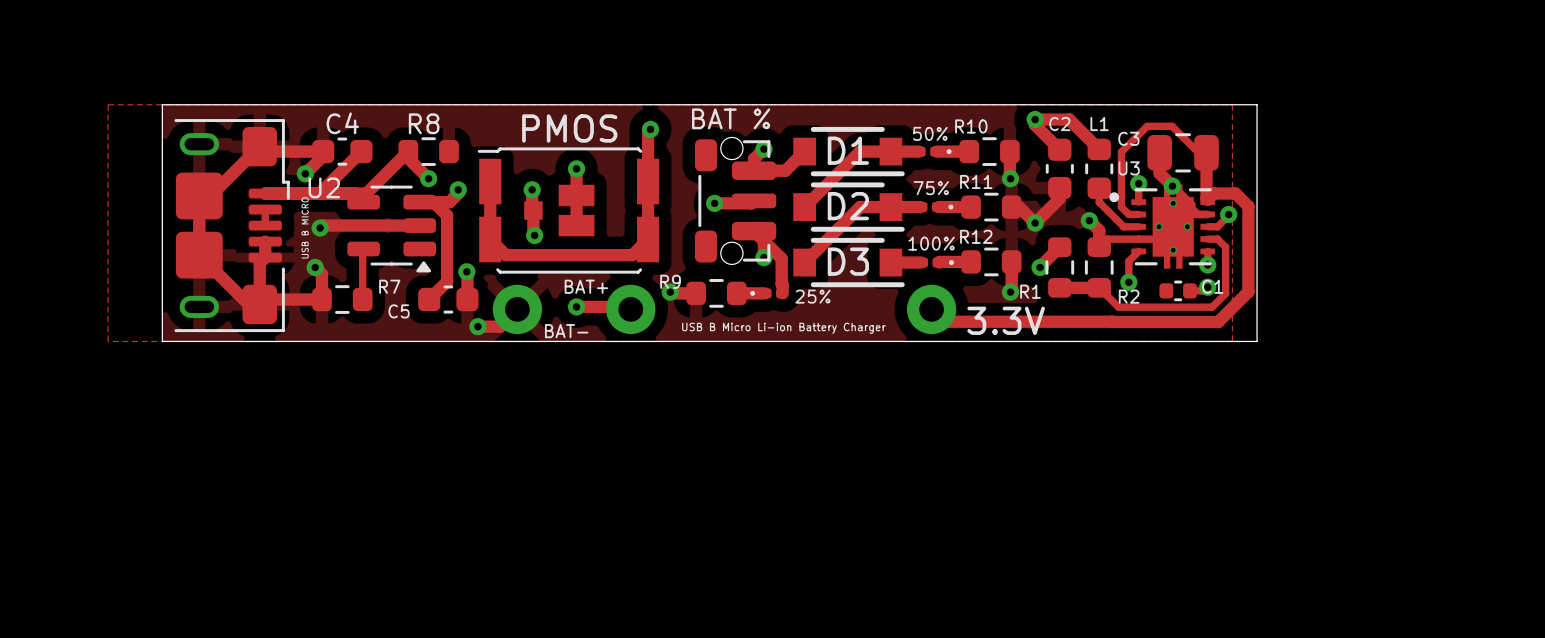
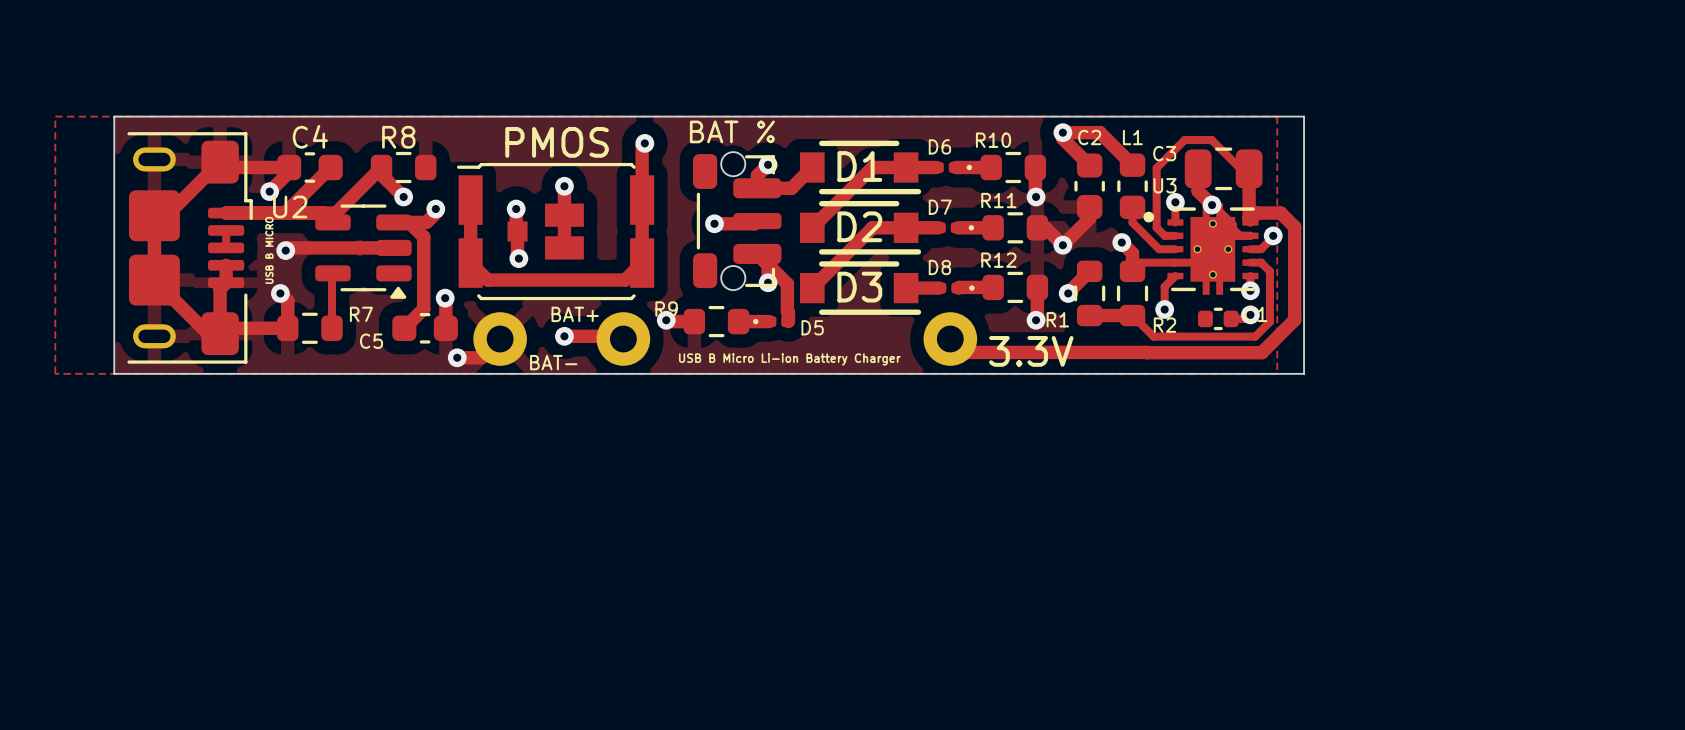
50% name: 50% (930, 133) -> D6 (939, 146)
75% name: 75% (931, 188) -> D7 (940, 207)
100% name: 100% (931, 243) -> D8 (939, 267)
25% name: 25% (812, 296) -> D5 (812, 327)

